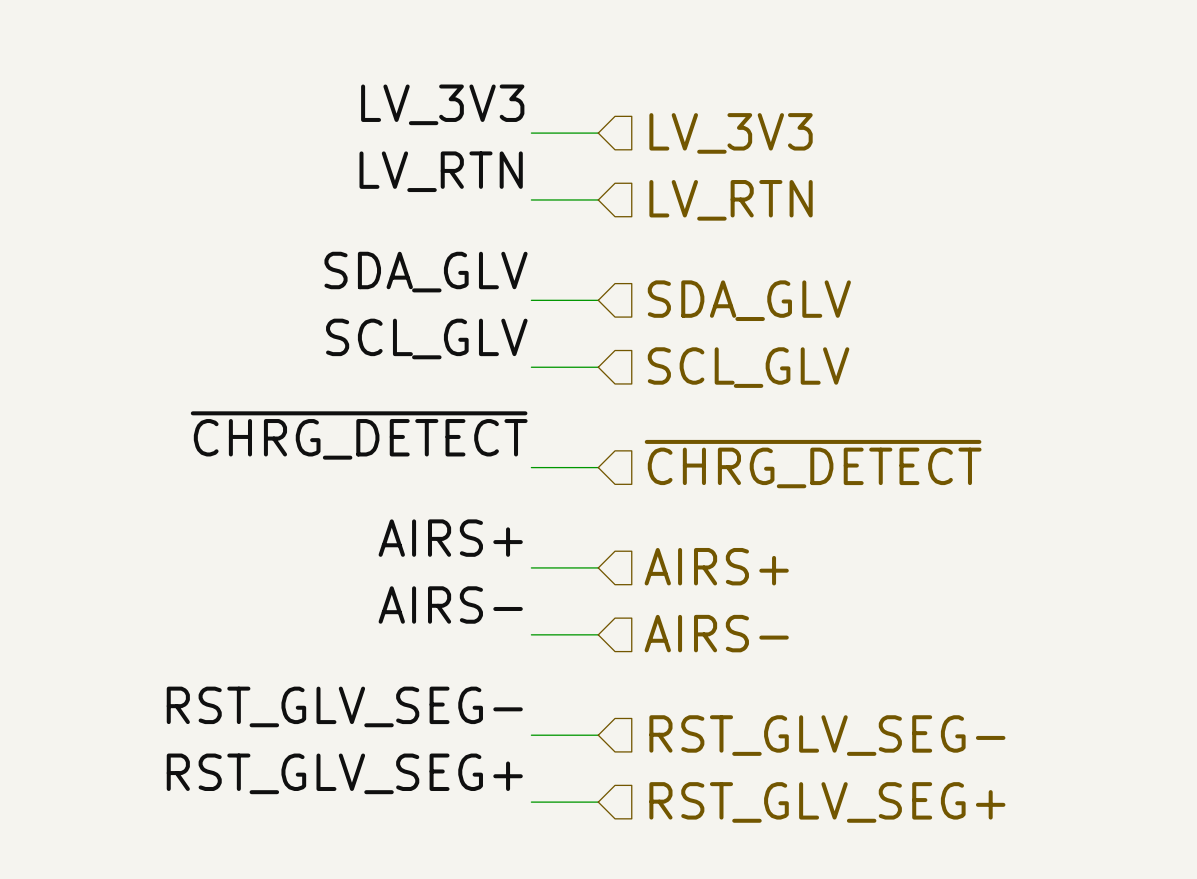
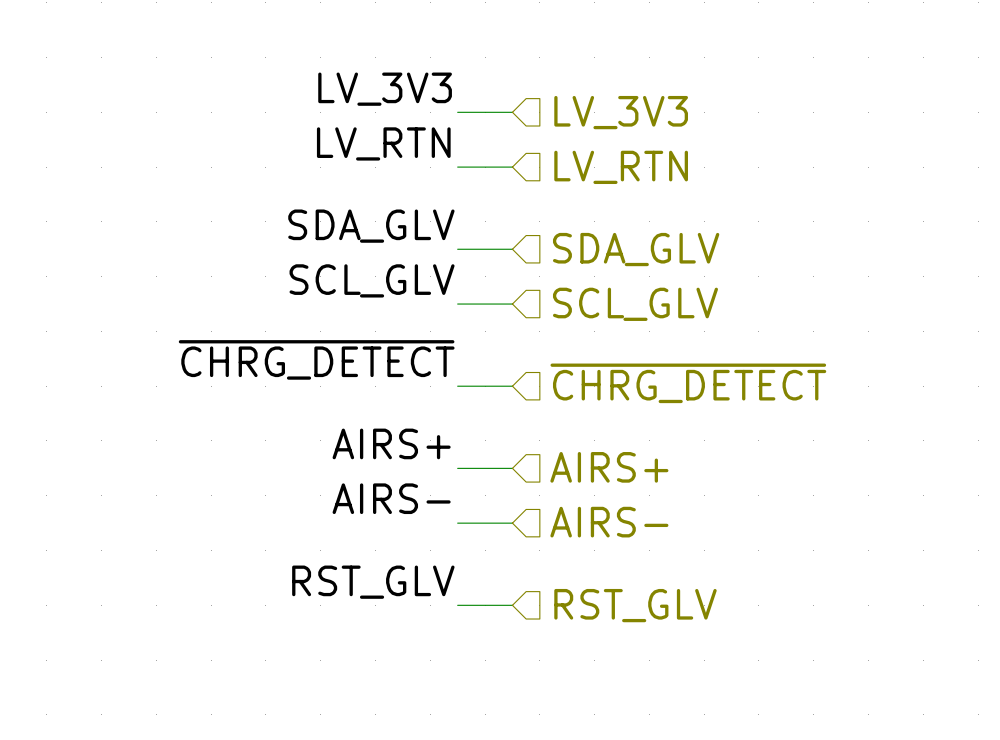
label: RST_GLV_SEG- (344, 706) -> RST_GLV (373, 582)
hierarchical label: RST_GLV_SEG- (827, 735) -> RST_GLV (635, 605)
label: RST_GLV_SEG+ (344, 773) -> none
wire: (531, 802) (598, 802) -> none
hierarchical label: RST_GLV_SEG+ (827, 802) -> none

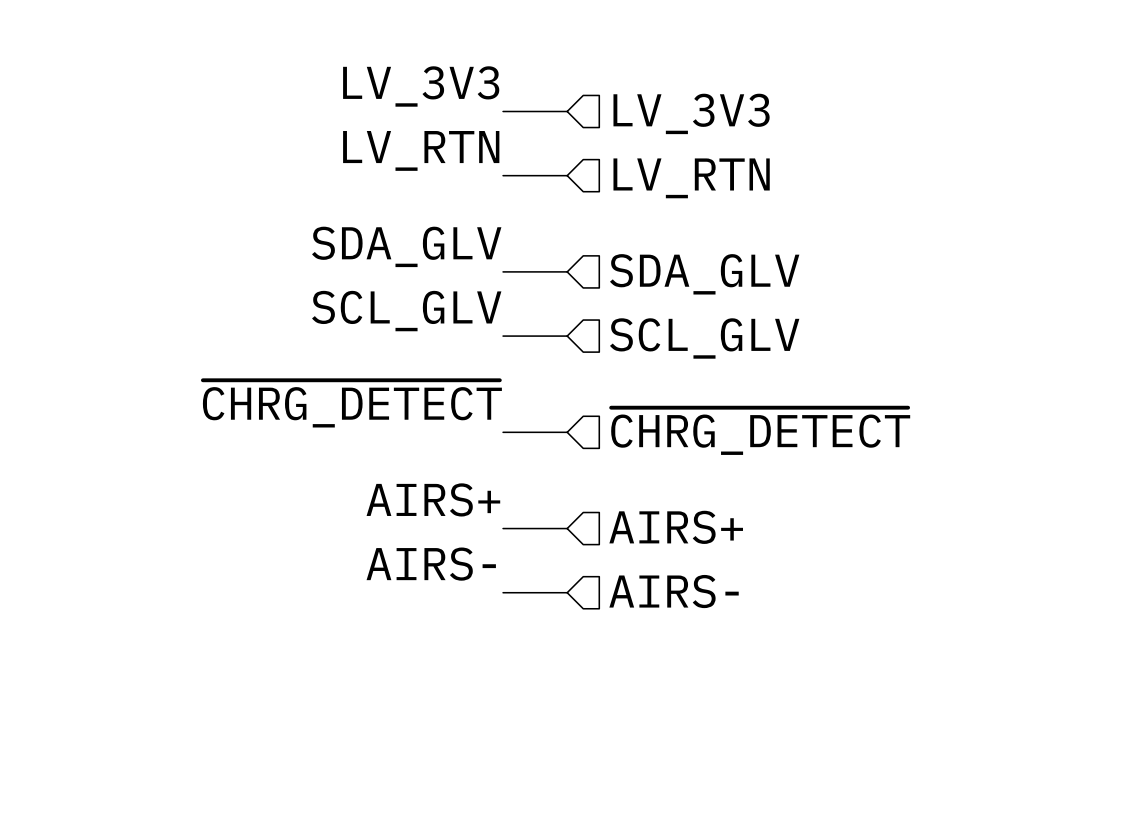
label: RST_GLV (373, 582) -> none
wire: (457, 605) (512, 605) -> none
hierarchical label: RST_GLV (635, 605) -> none

